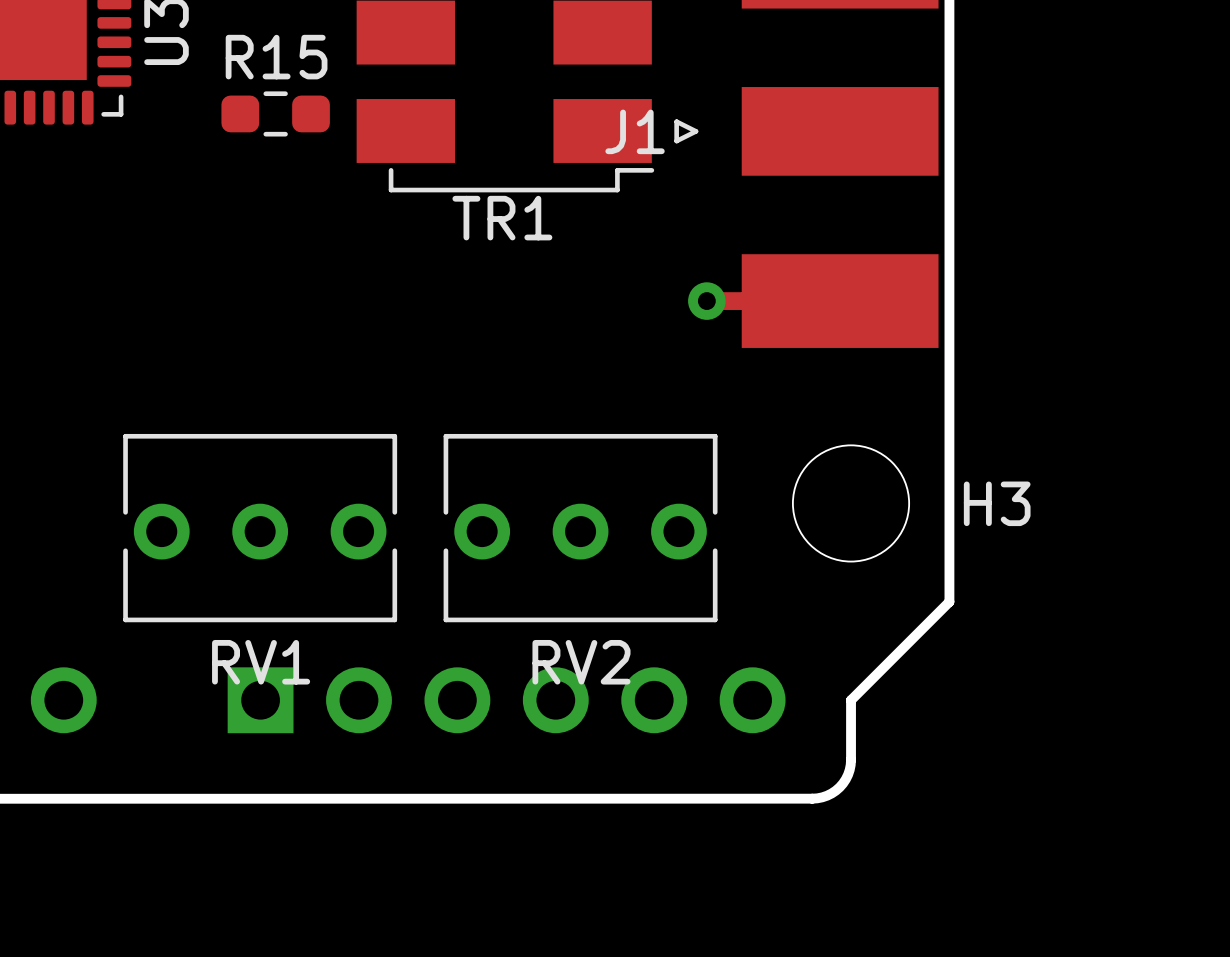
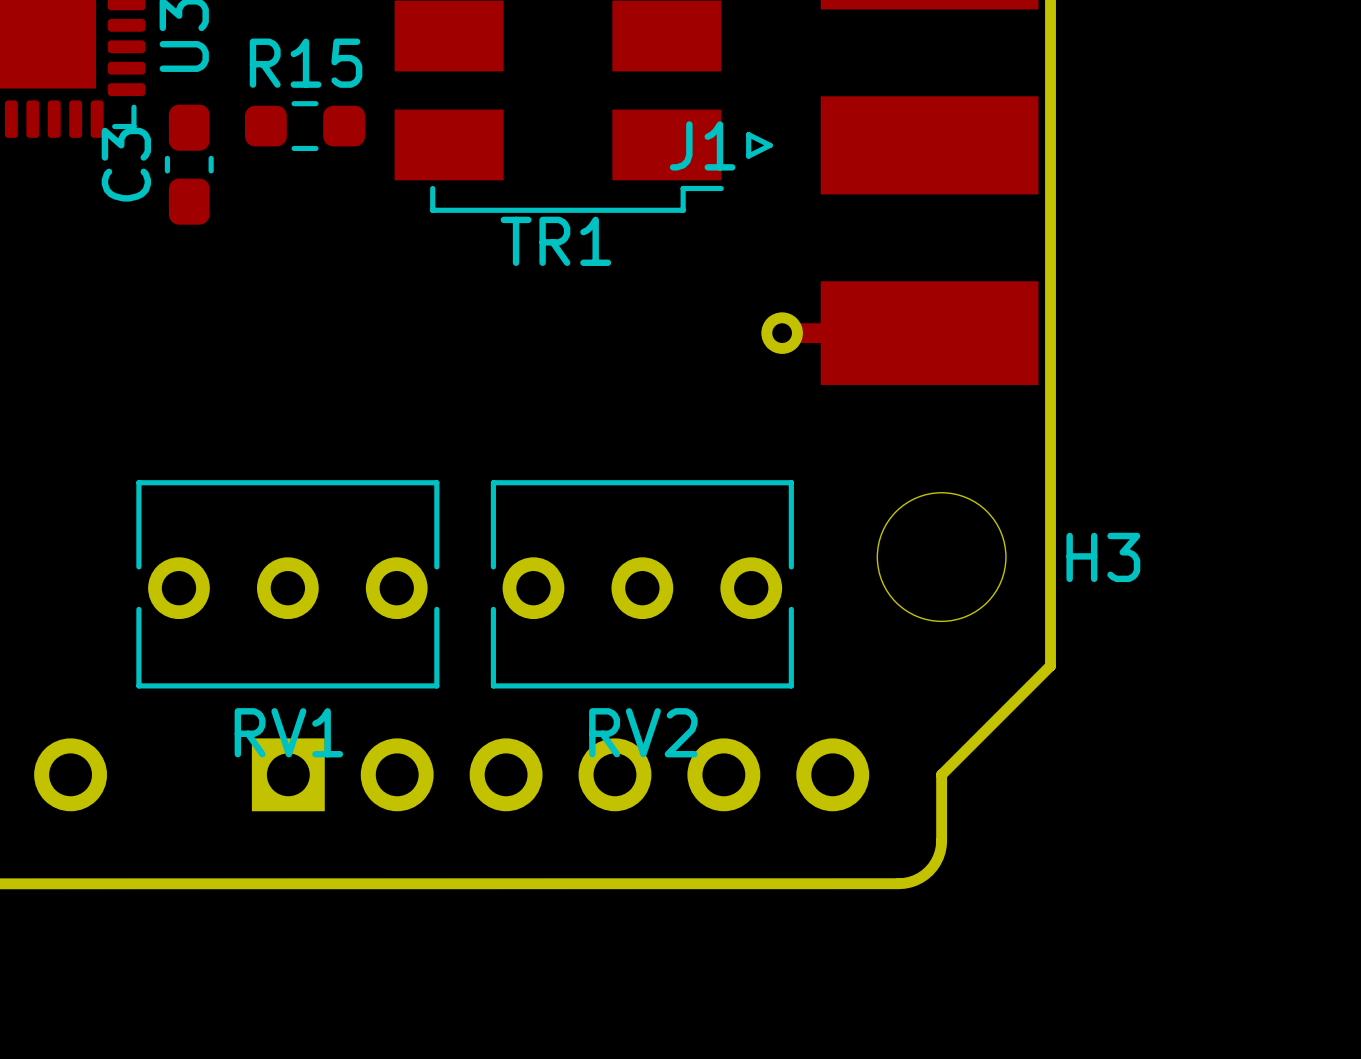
C3: none -> (189, 164)

